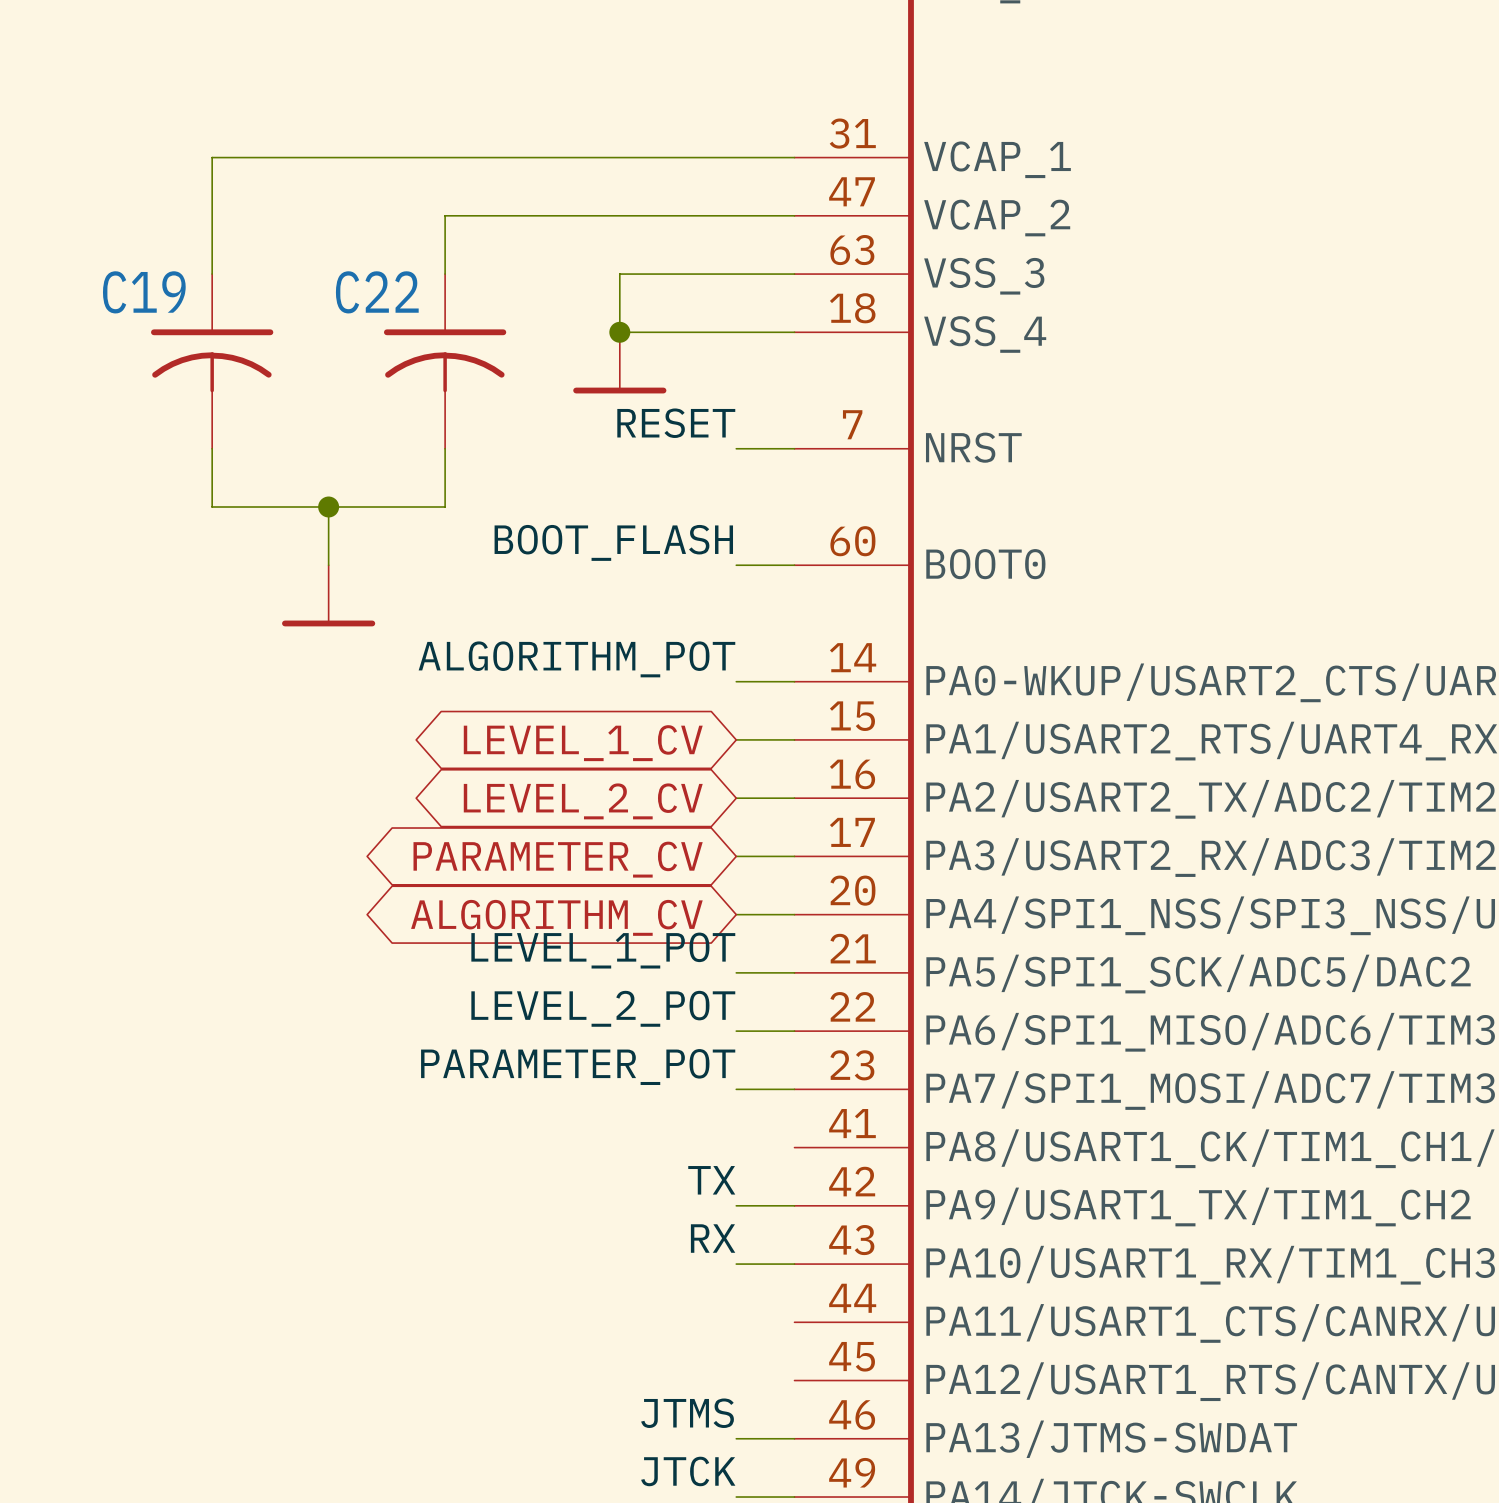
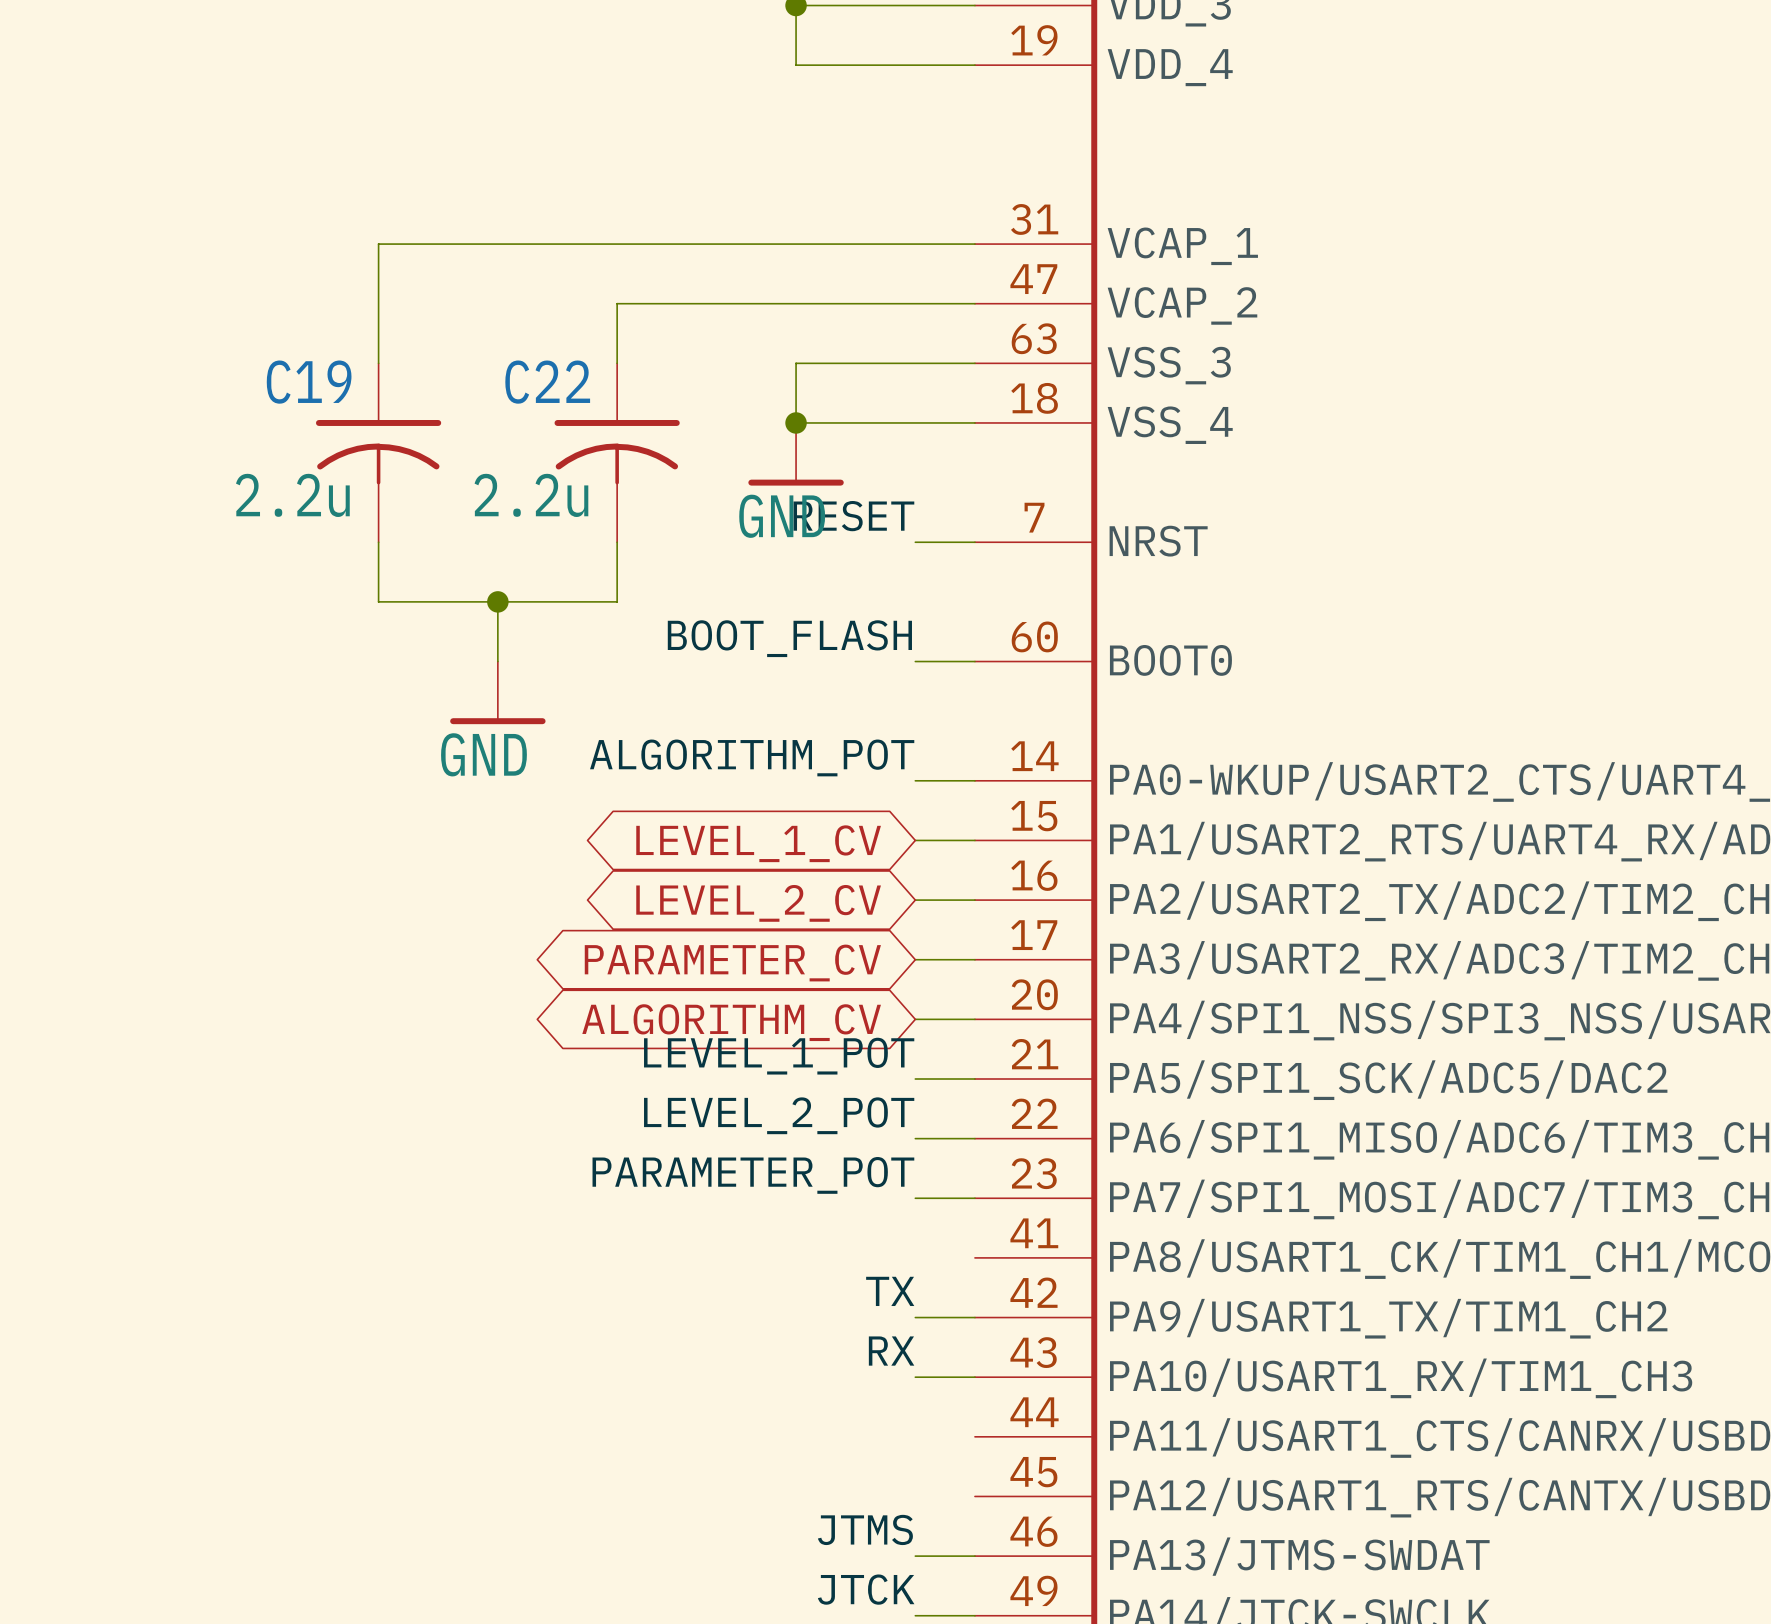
C19 value: none -> 2.2u (292, 495)
C22 value: none -> 2.2u (531, 495)
power symbol text: none -> GND (782, 516)
power symbol text: none -> GND (483, 754)

